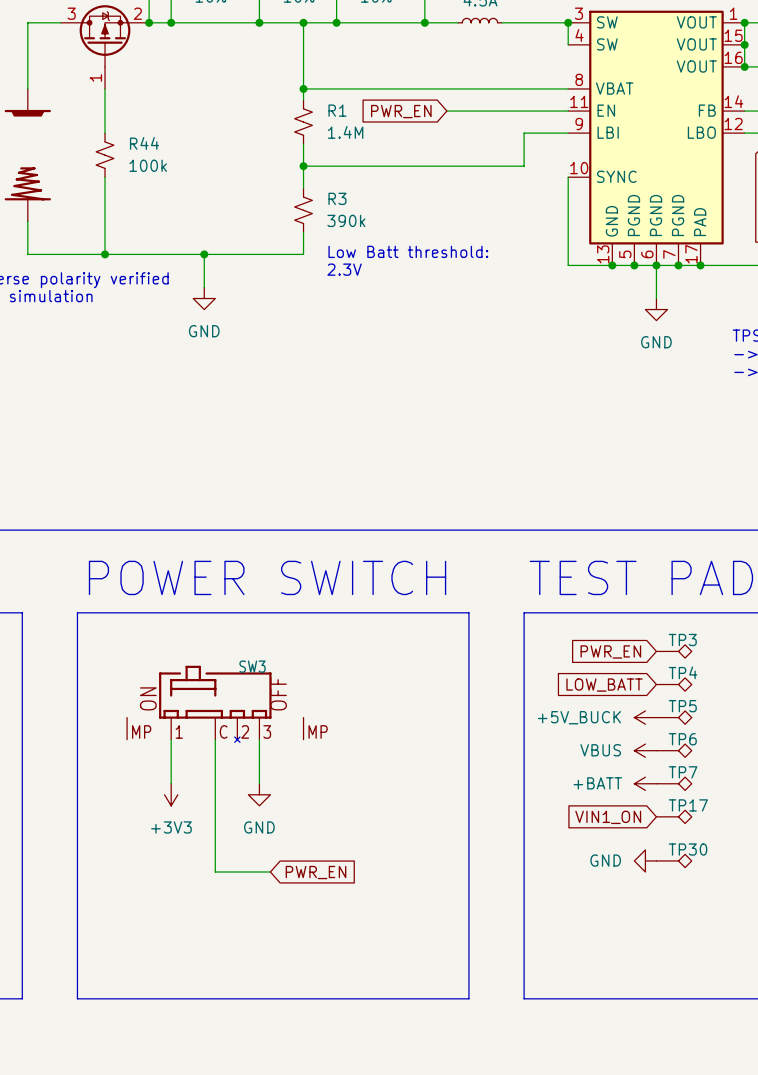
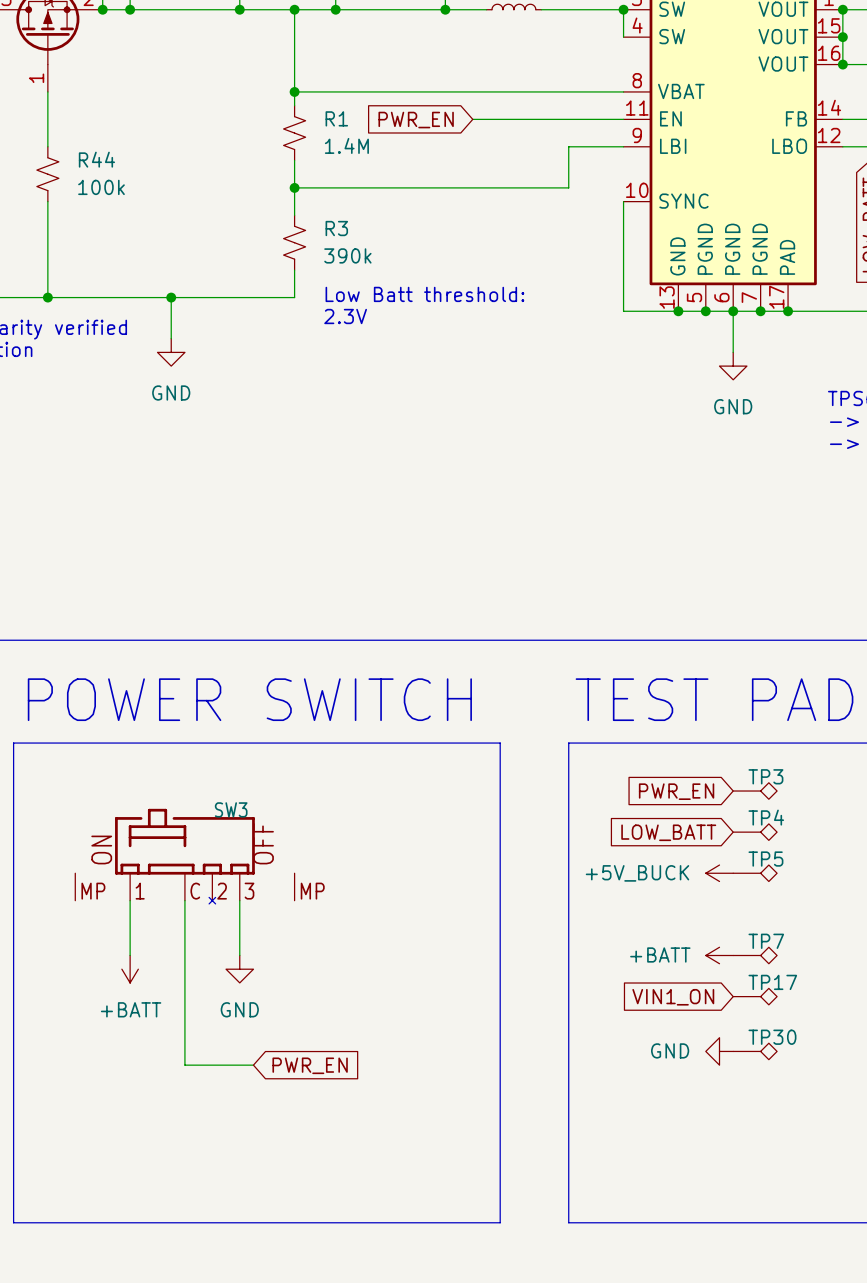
power symbol: VBUS (645, 750) -> none
TP6: (674, 750) -> none
power symbol: +3V3 (171, 794) -> +BATT (130, 969)

